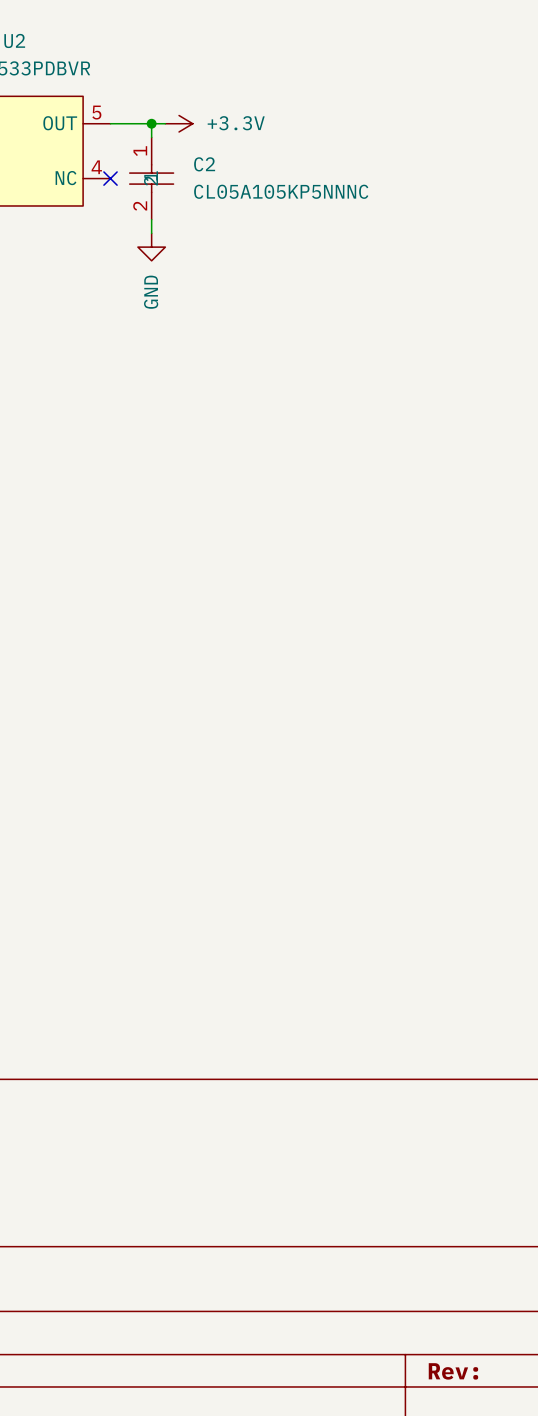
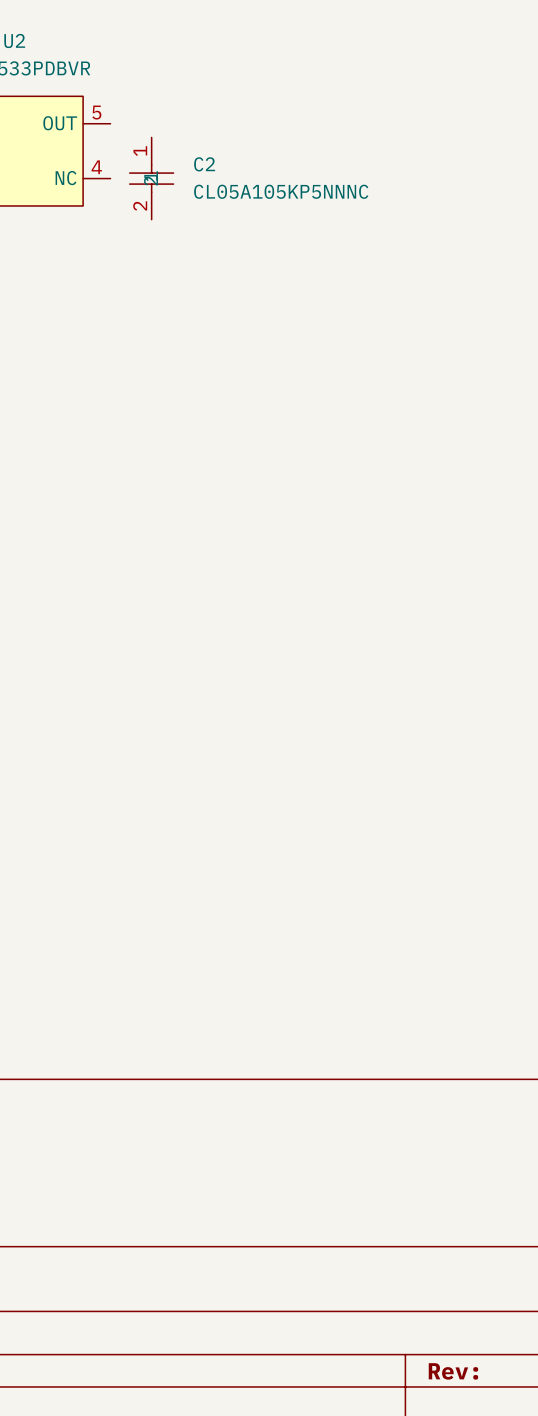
wire: (110, 123) (165, 123) -> none
wire: (151, 123) (151, 137) -> none
junction: (151, 123) -> none
power symbol: +3.3V (179, 123) -> none
no-connect mark: (110, 178) -> none
wire: (151, 219) (151, 233) -> none
power symbol: GND (151, 247) -> none

